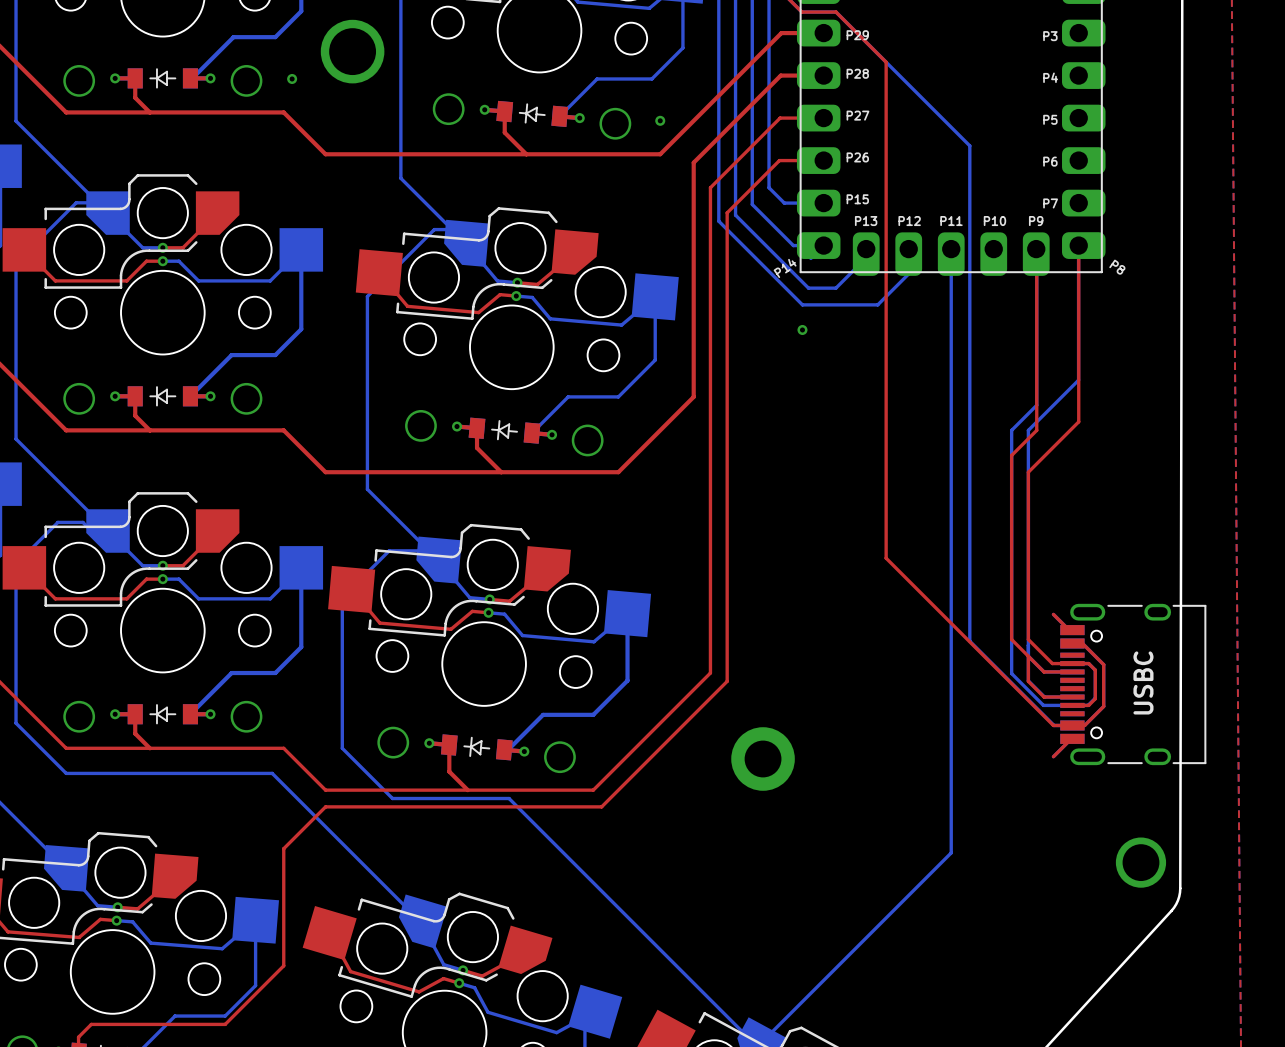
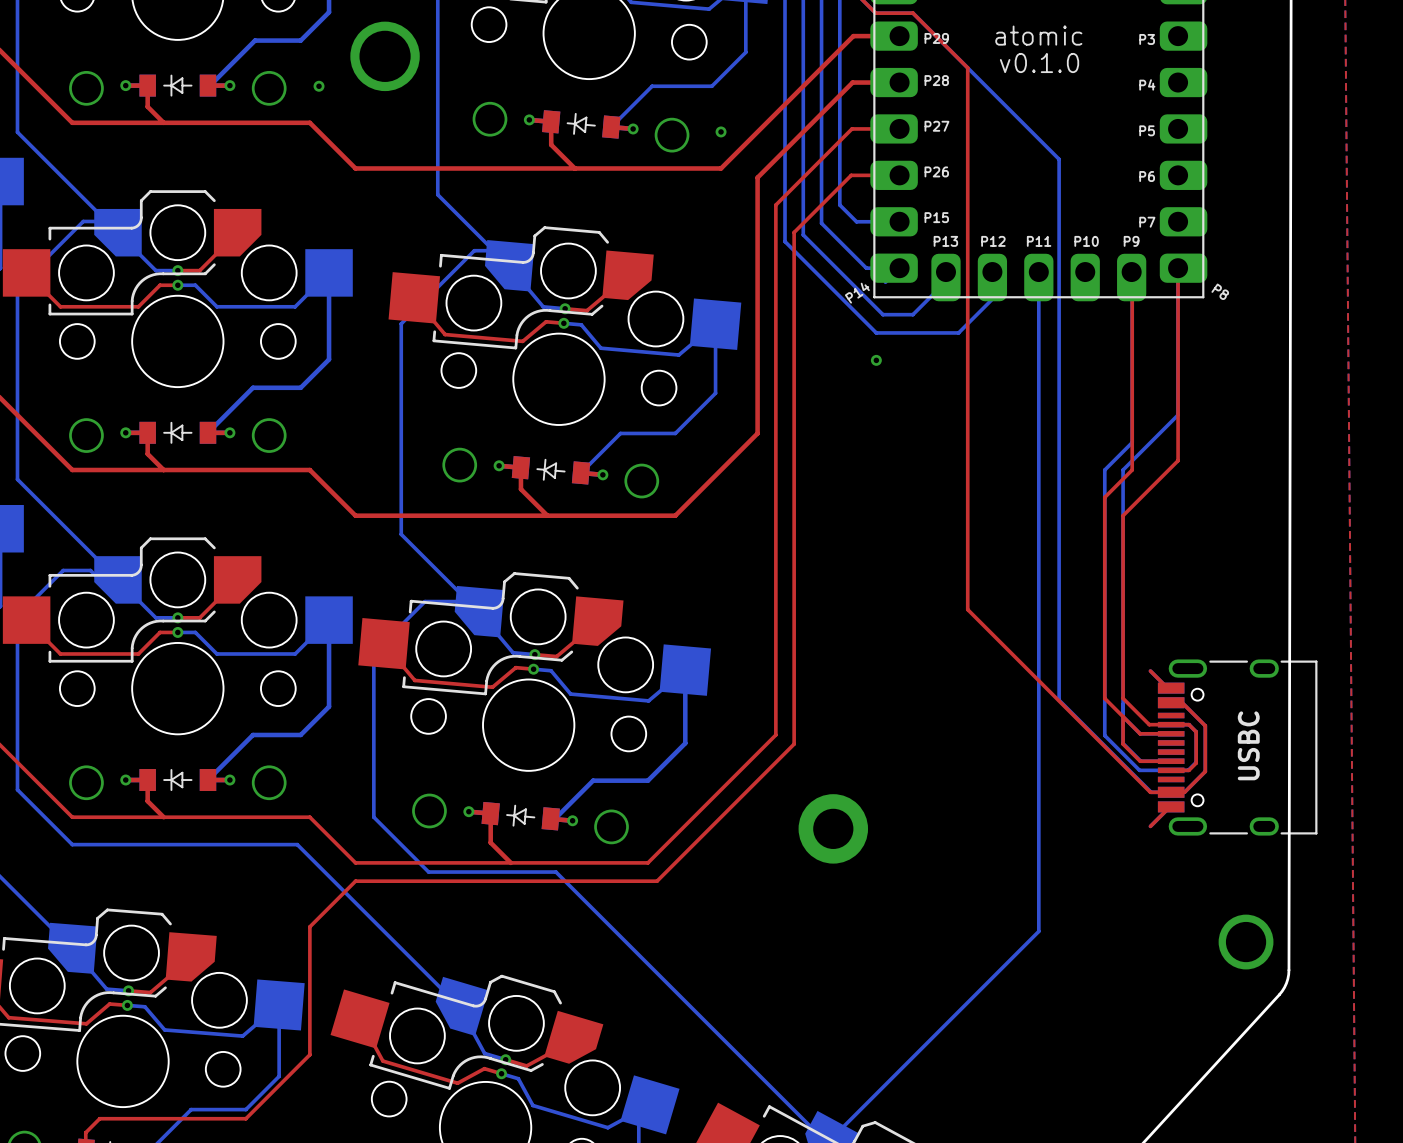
text: none -> atomic (1038, 35)
text: none -> v0.1.0 (1039, 63)

